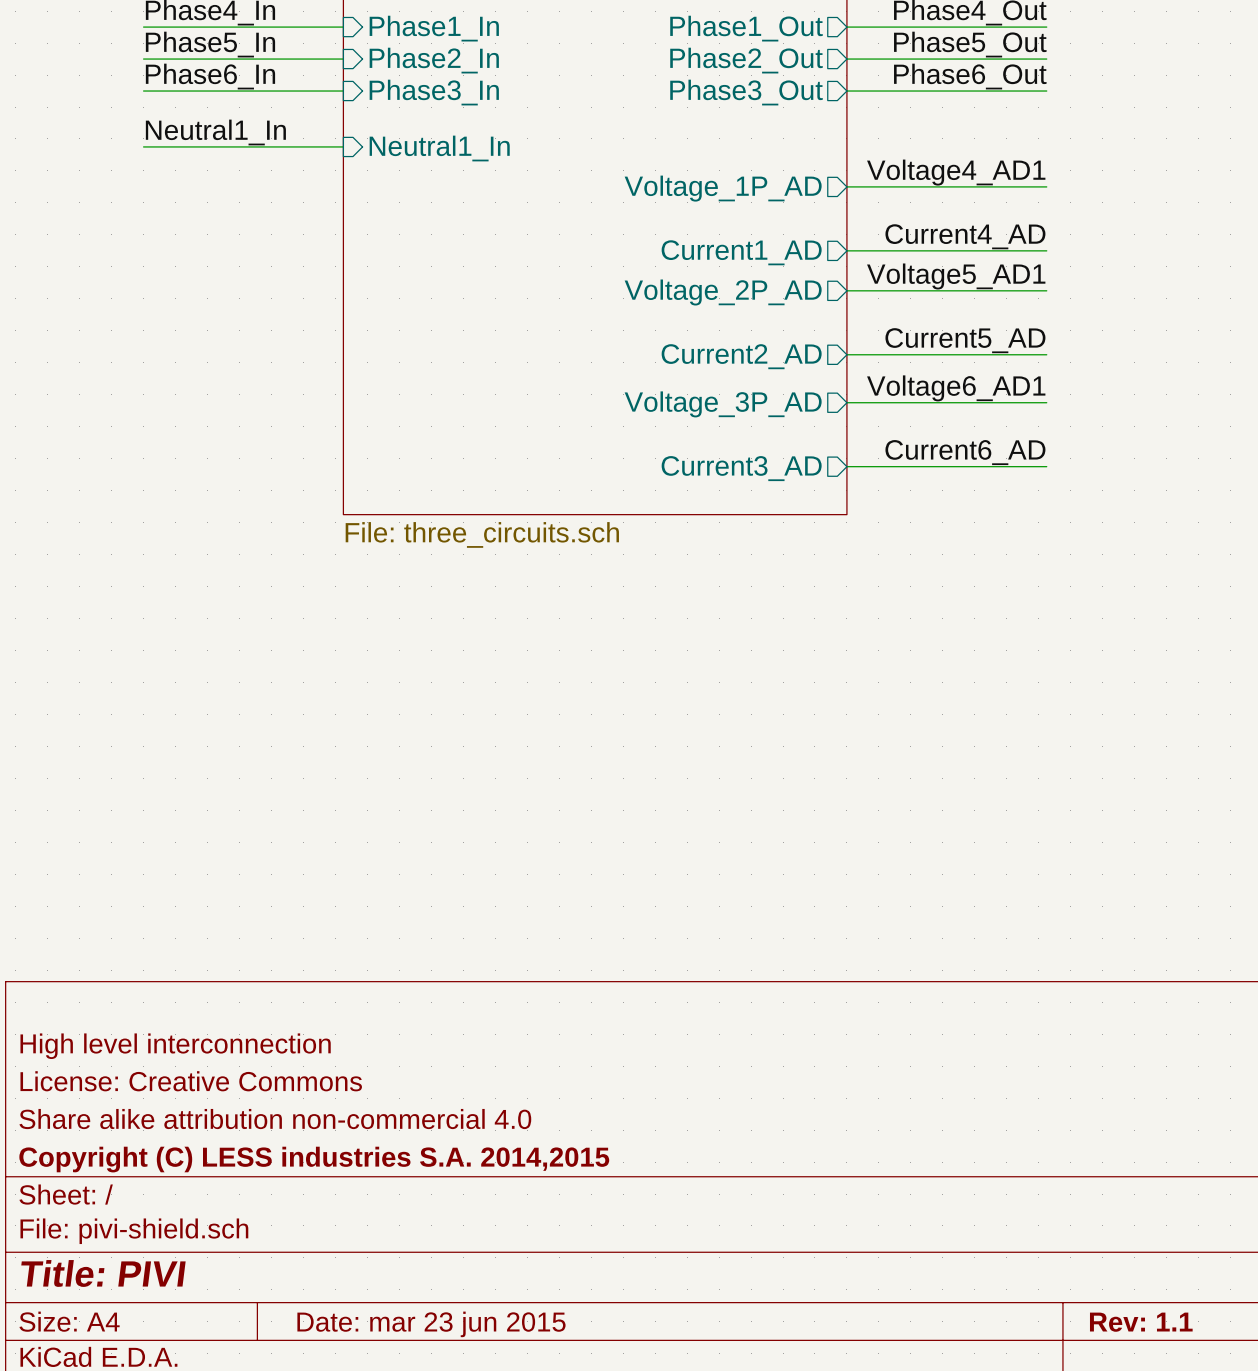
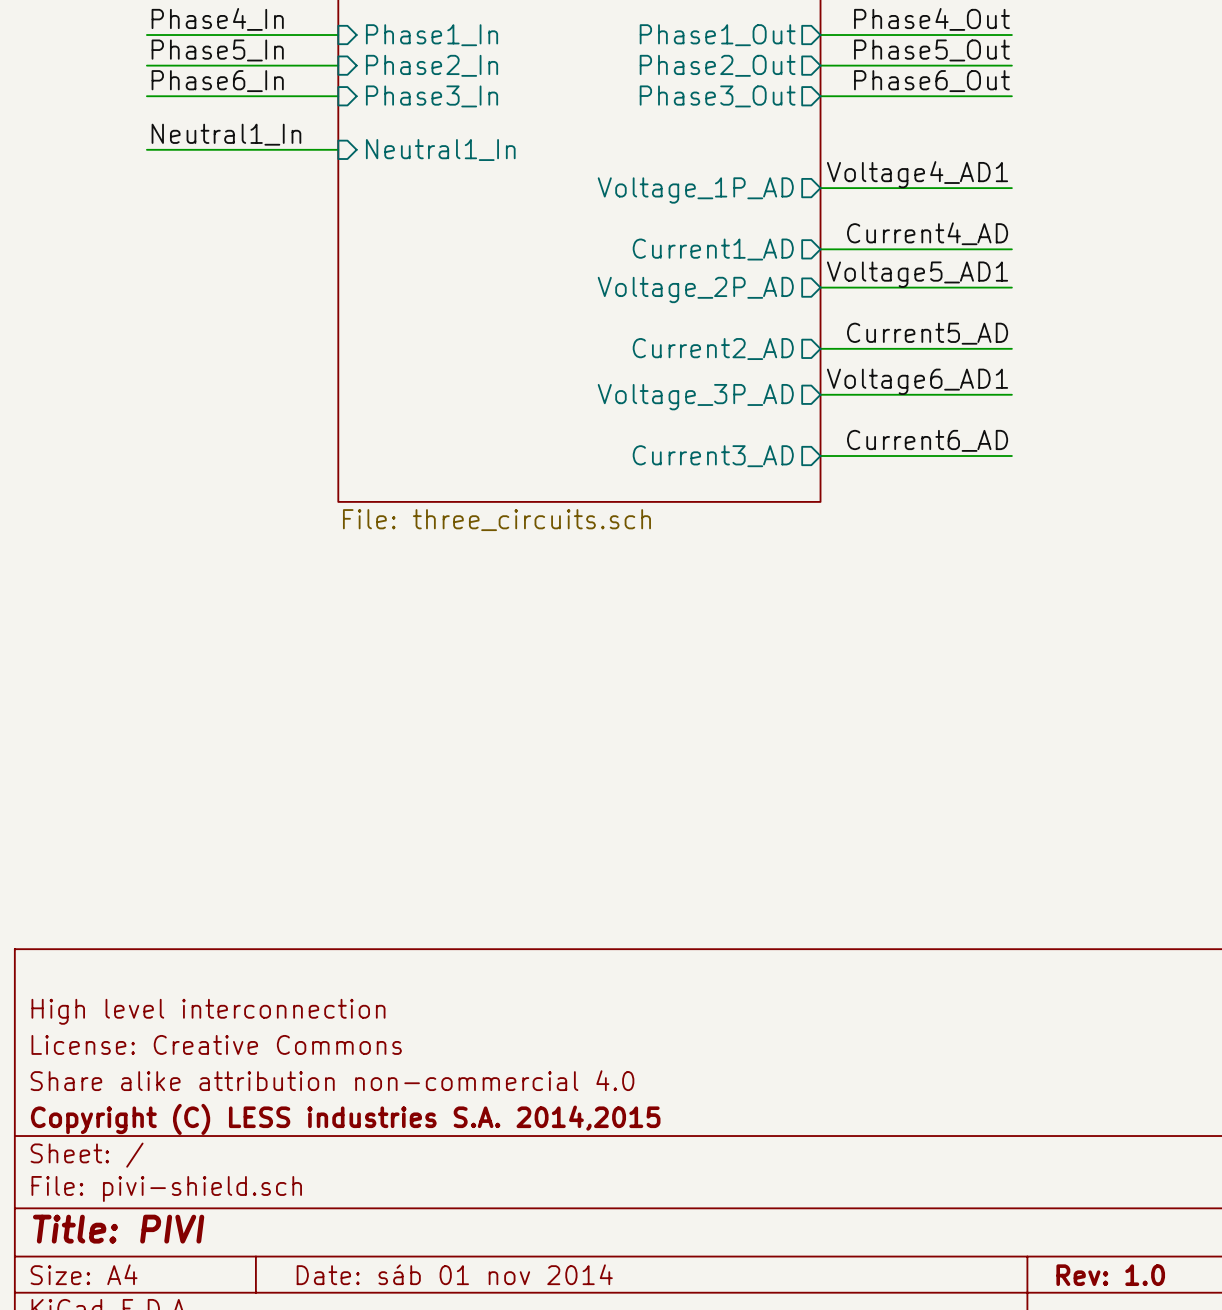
title block: Rev: 1.1 (1141, 1322) -> Rev: 1.0 (1110, 1275)
title block: Date: mar 23 jun 2015 (431, 1324) -> Date: sáb 01 nov 2014 (454, 1274)

